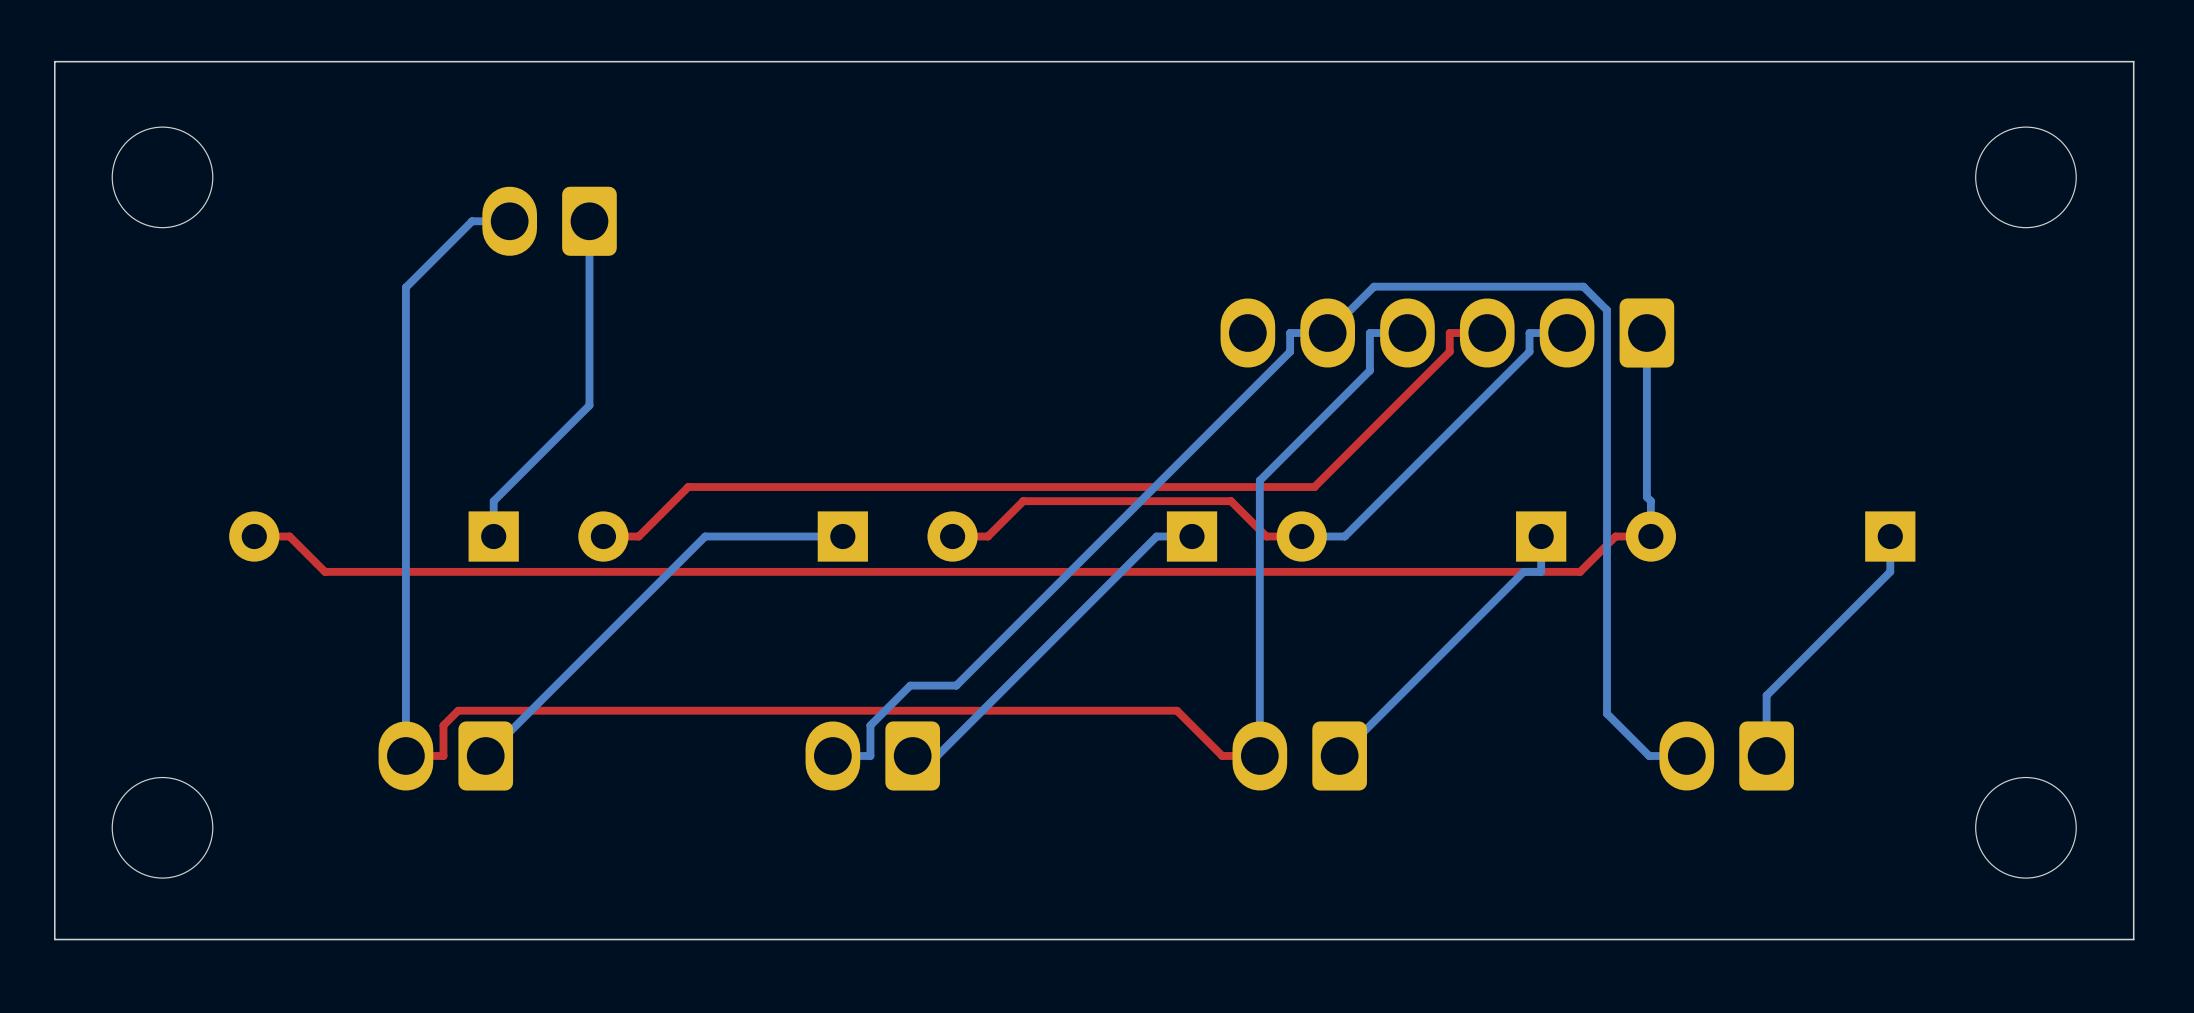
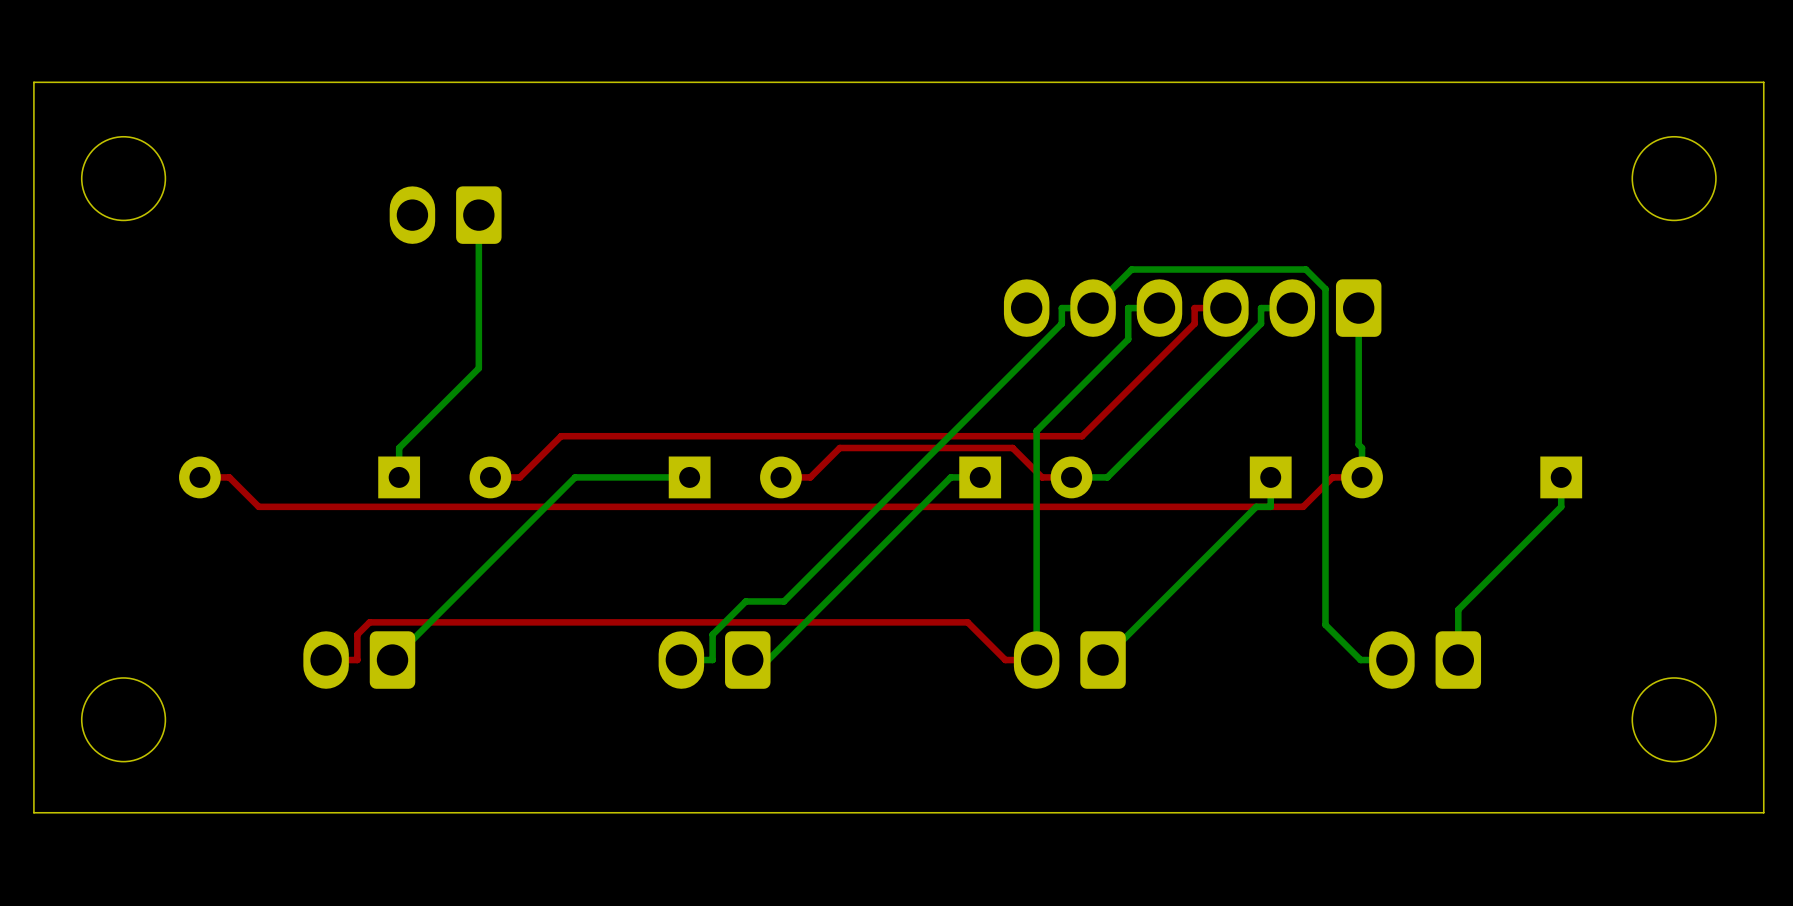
bottom track: (509, 221) (472, 221) (405, 287) (405, 755) -> none

